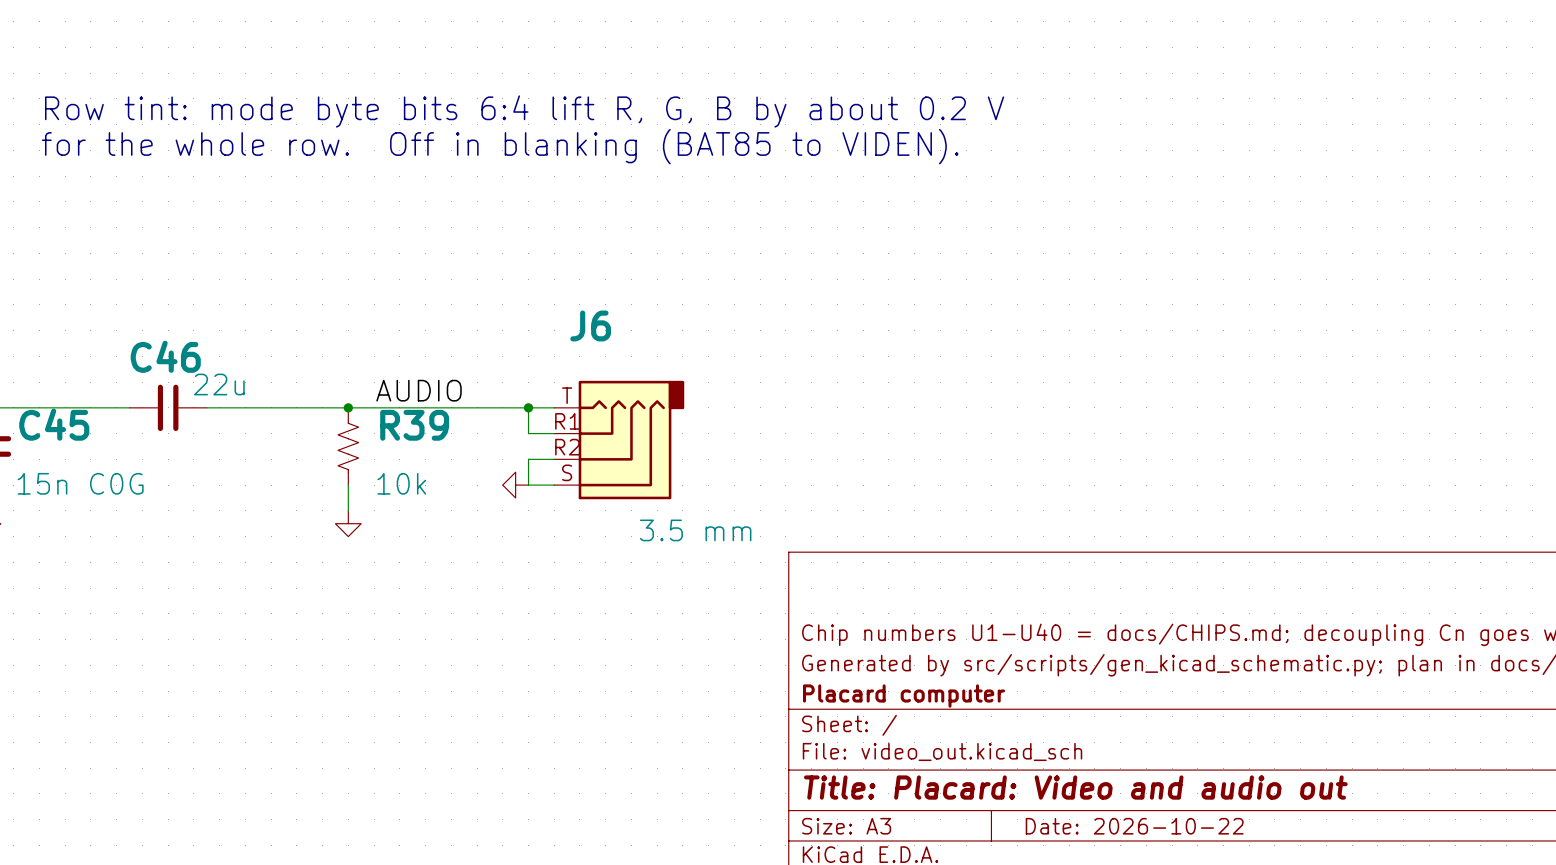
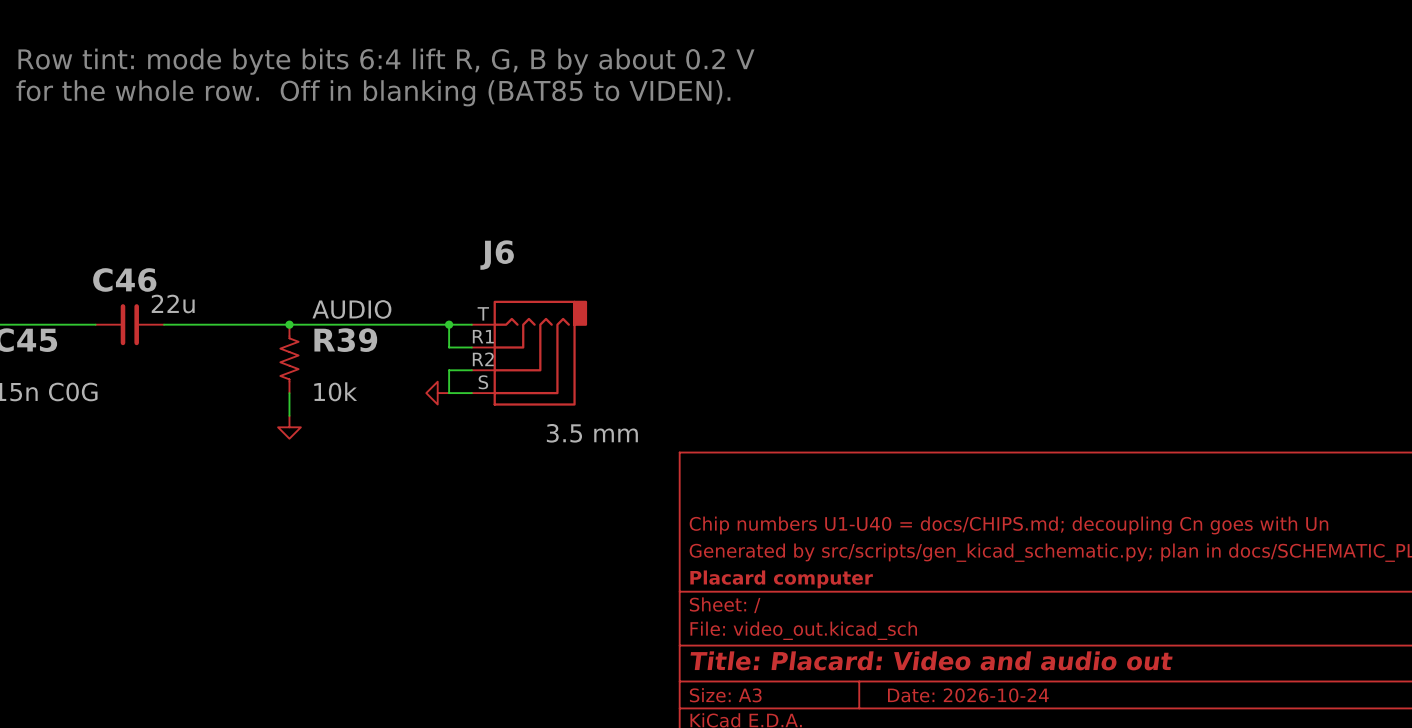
title block: Date: 2026-10-22 (1134, 826) -> Date: 2026-10-24 (968, 695)

